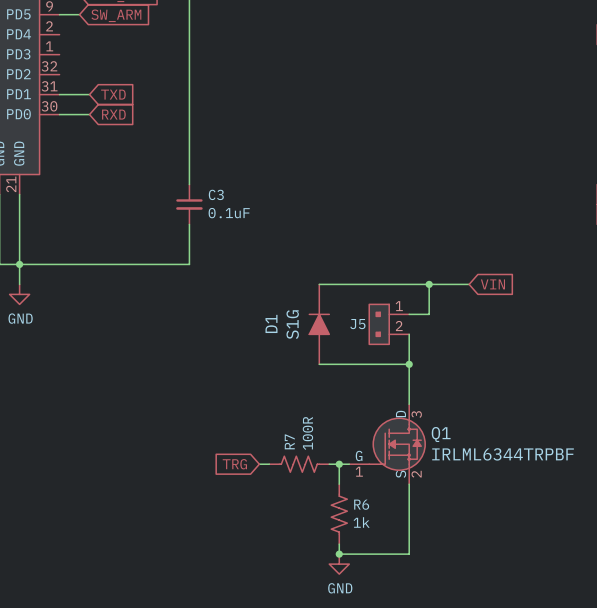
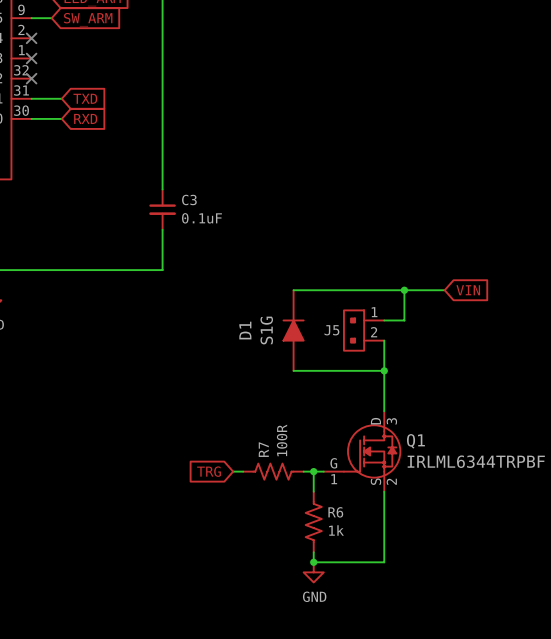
no-connect mark: none -> (31, 38)
no-connect mark: none -> (31, 58)
no-connect mark: none -> (31, 78)

